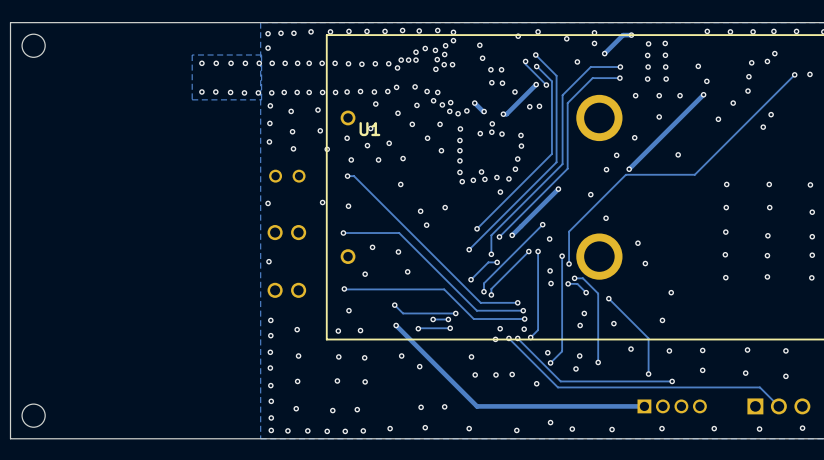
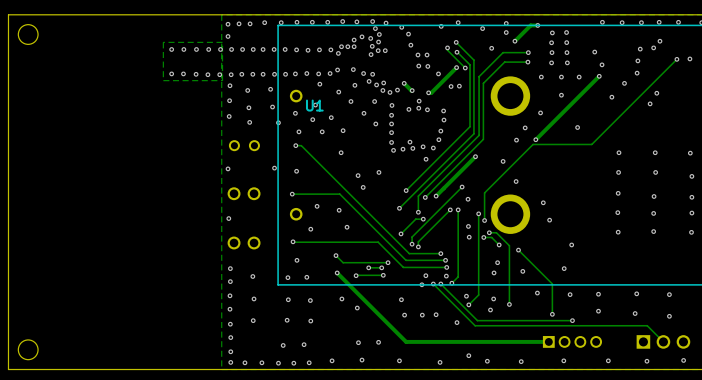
via: none -> (401, 27)
via: none -> (375, 28)
via: (453, 40) -> none
via: (296, 408) -> none

